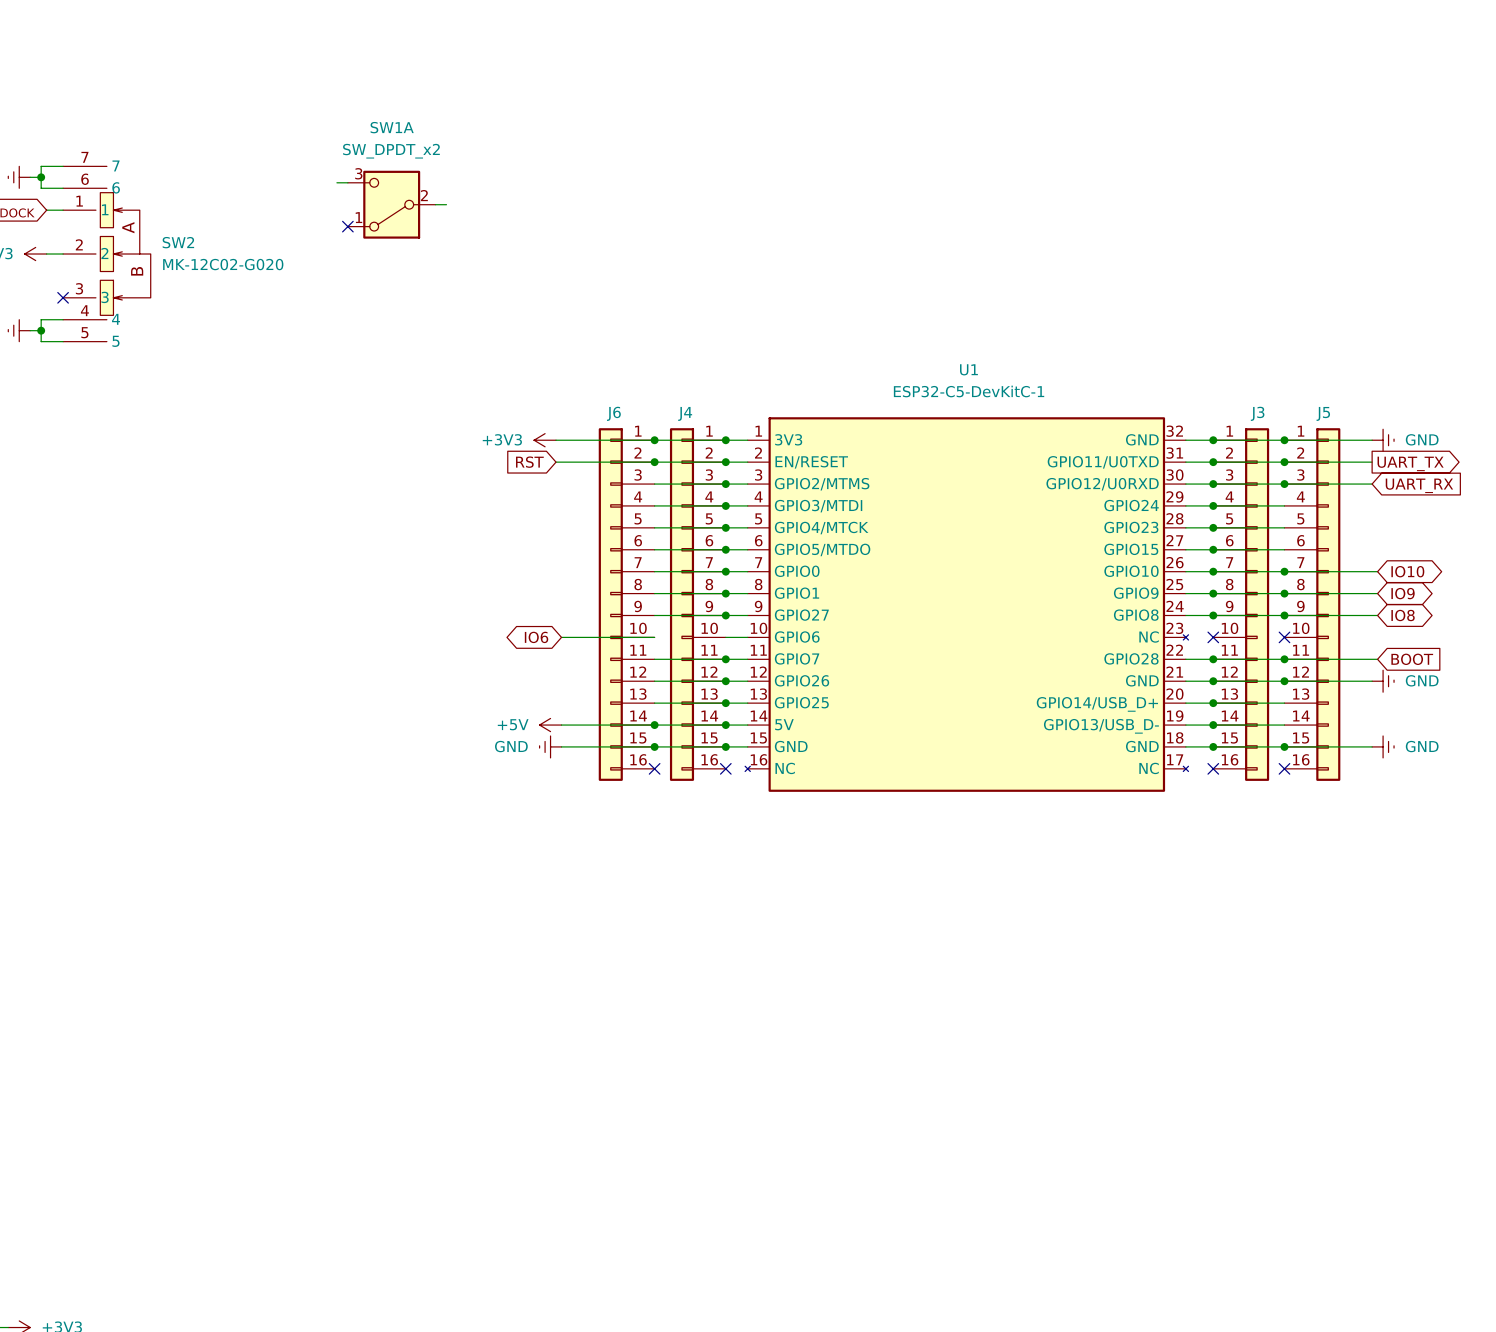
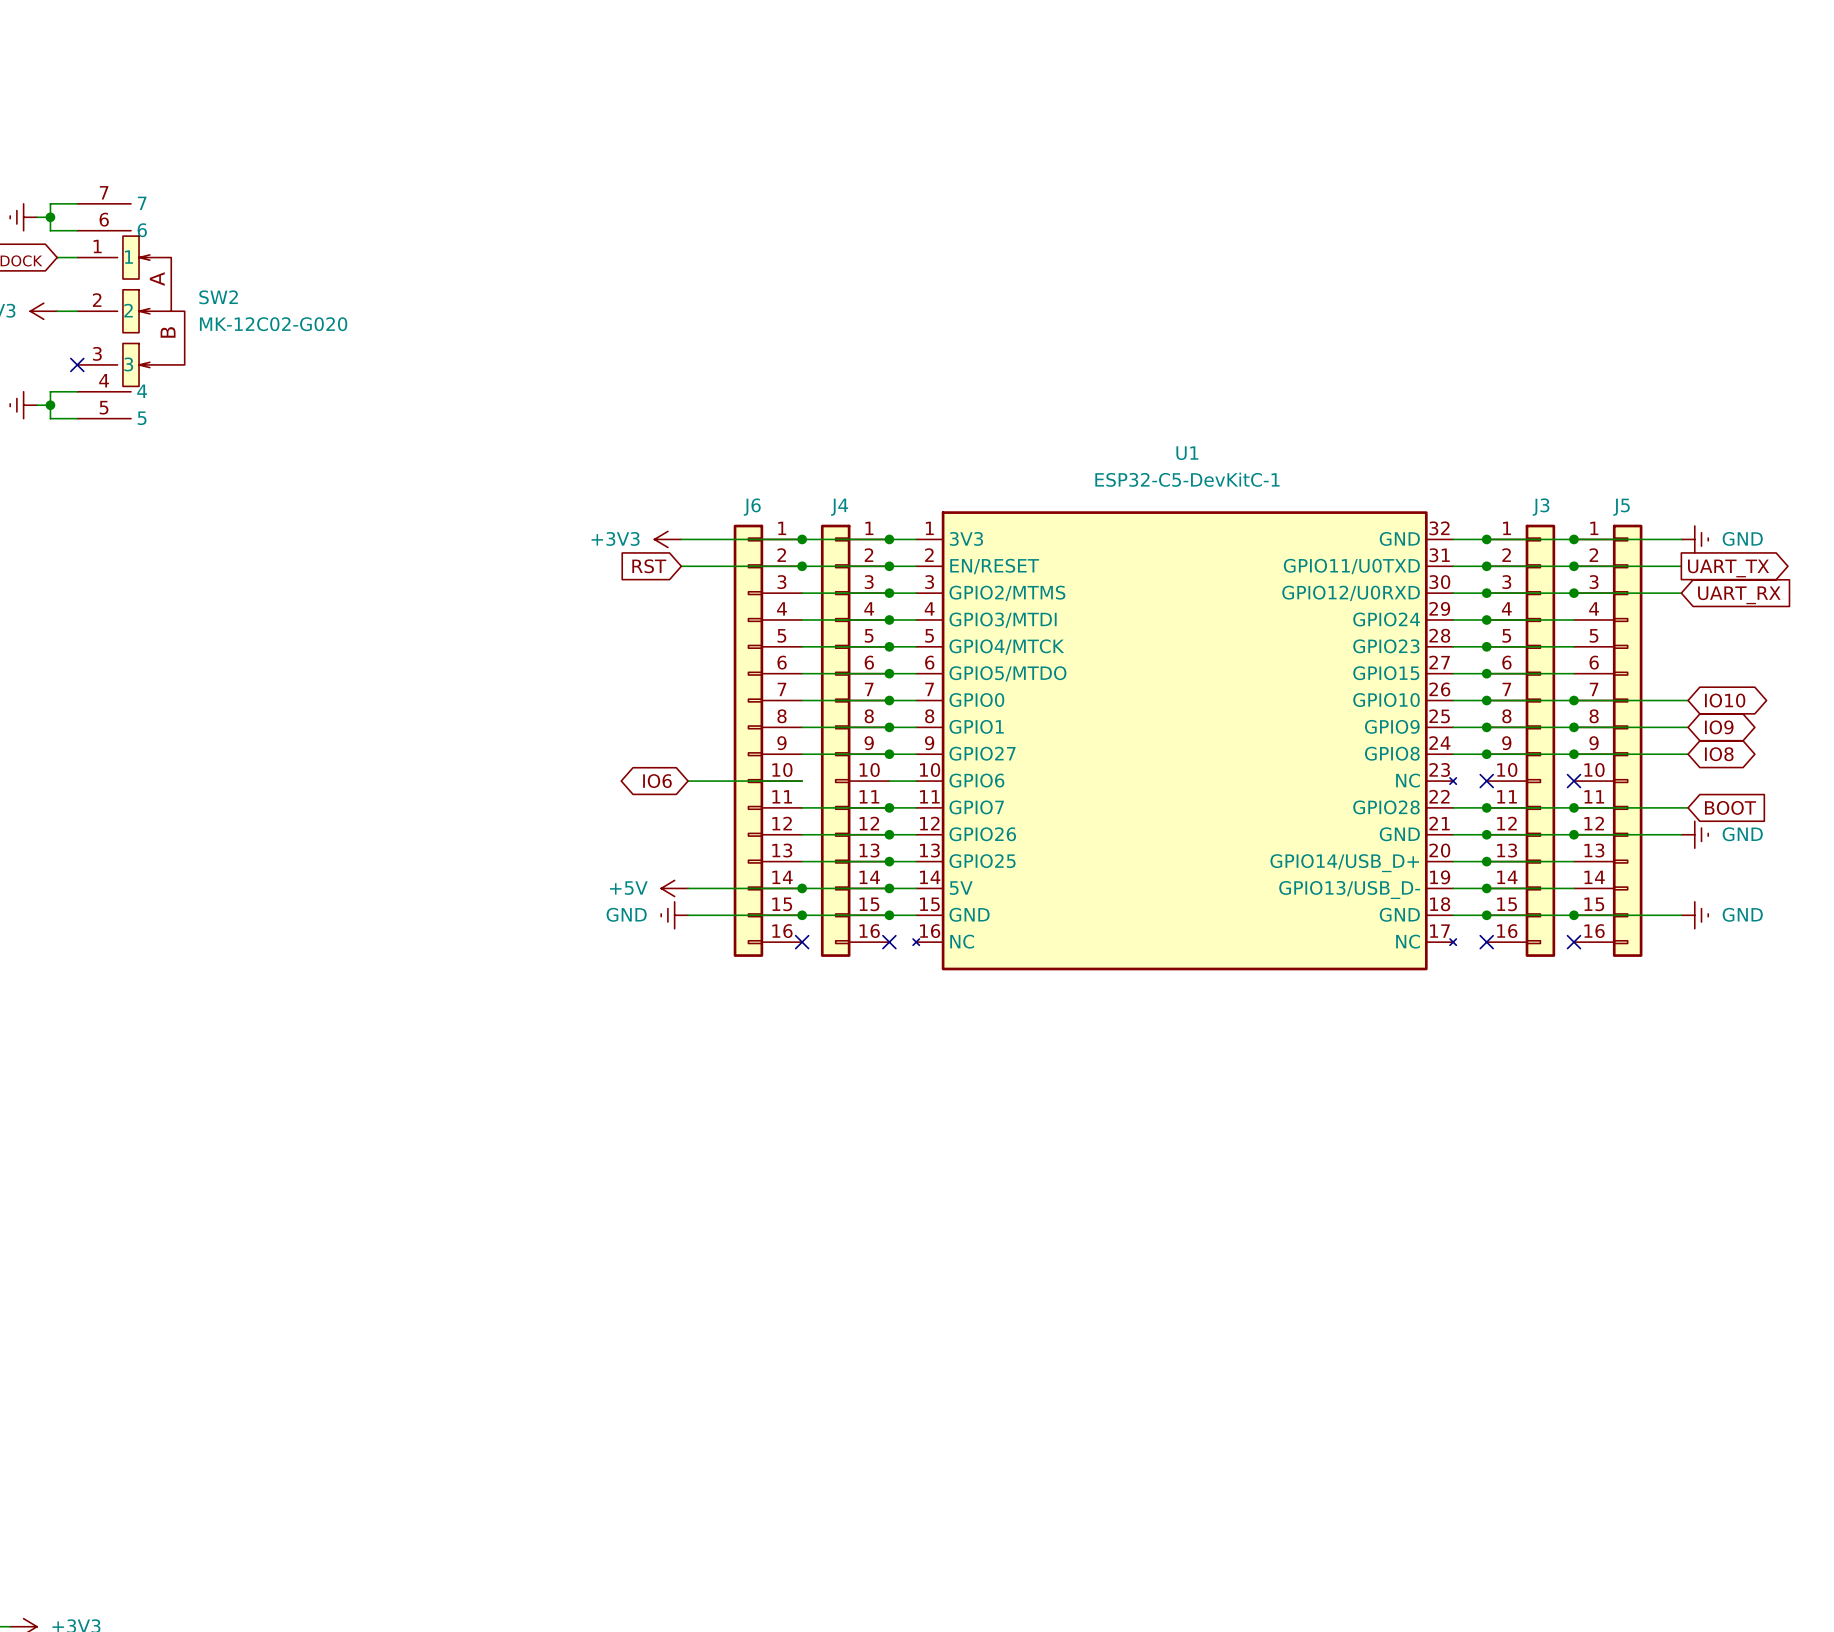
wire: (336, 182) (347, 182) -> none
SW1A: SW_DPDT_x2 (391, 204) -> none
wire: (435, 204) (446, 204) -> none
no-connect mark: (347, 226) -> none

